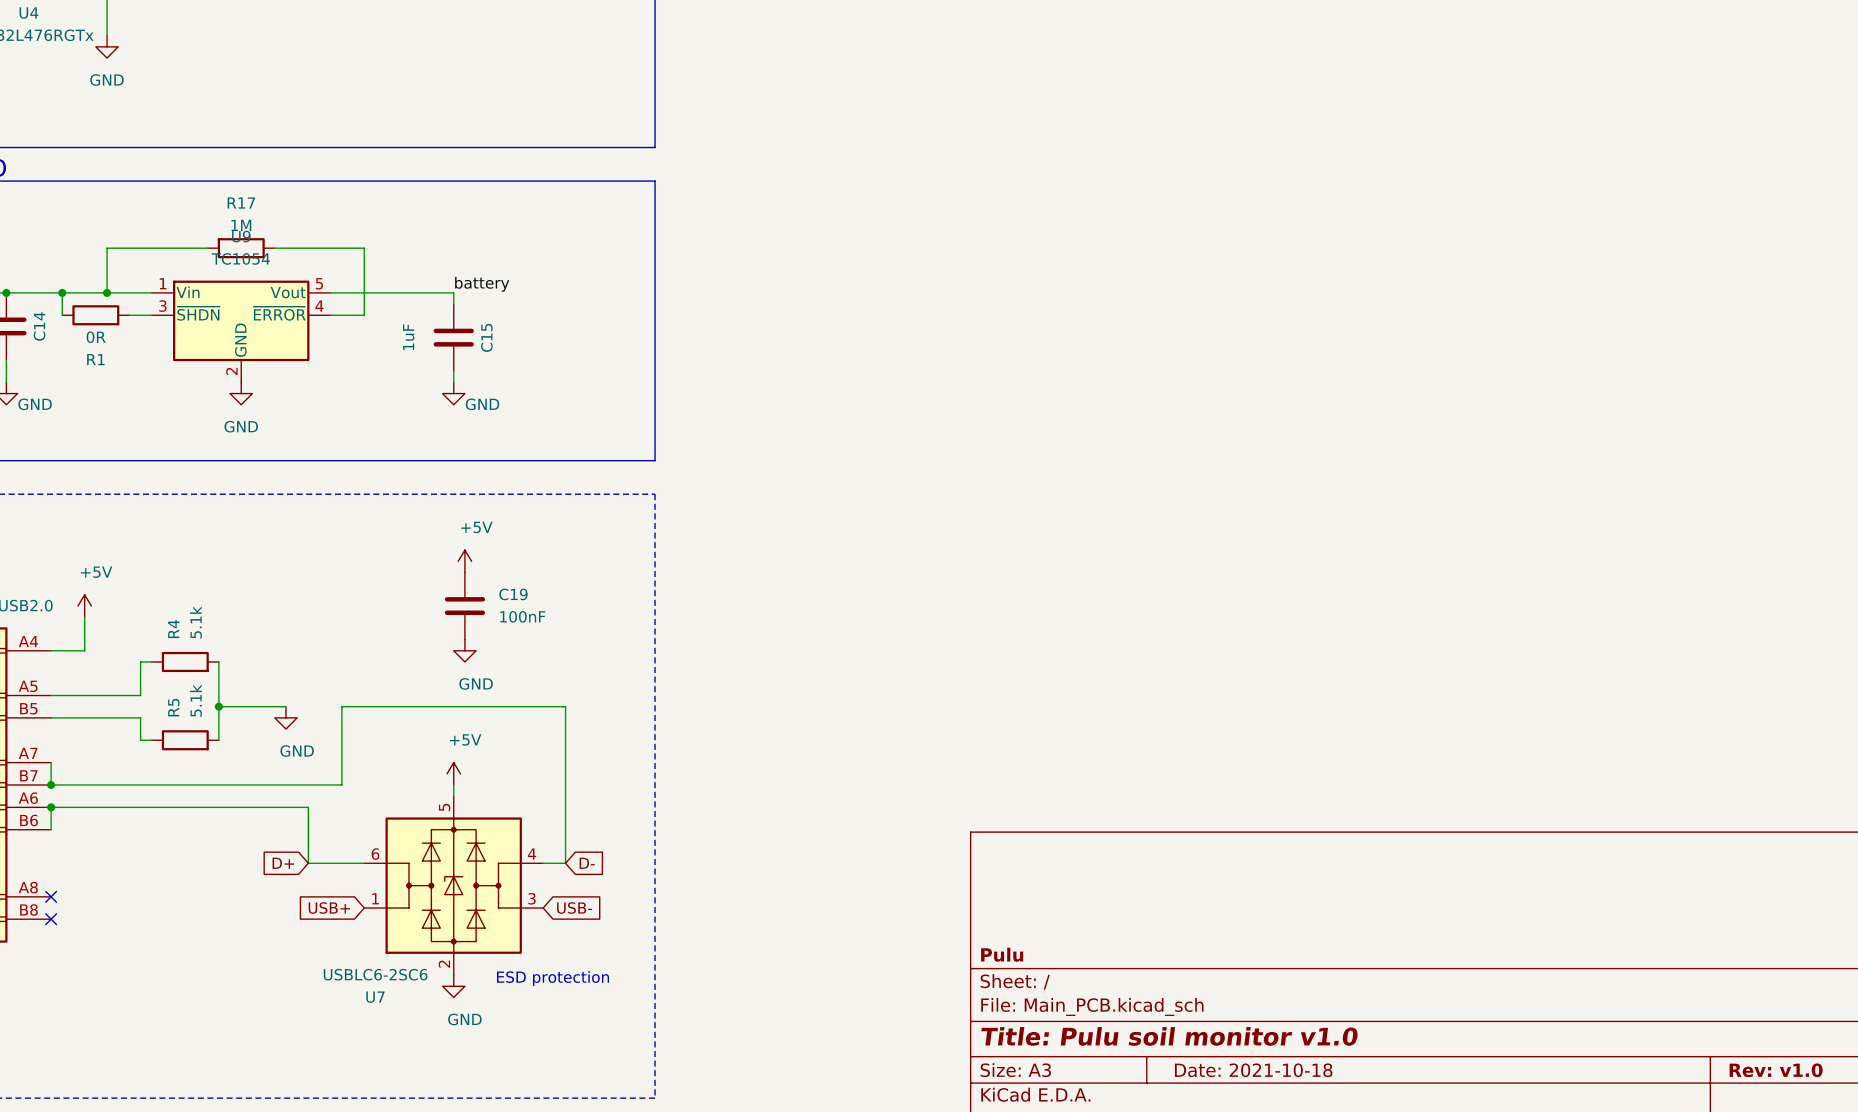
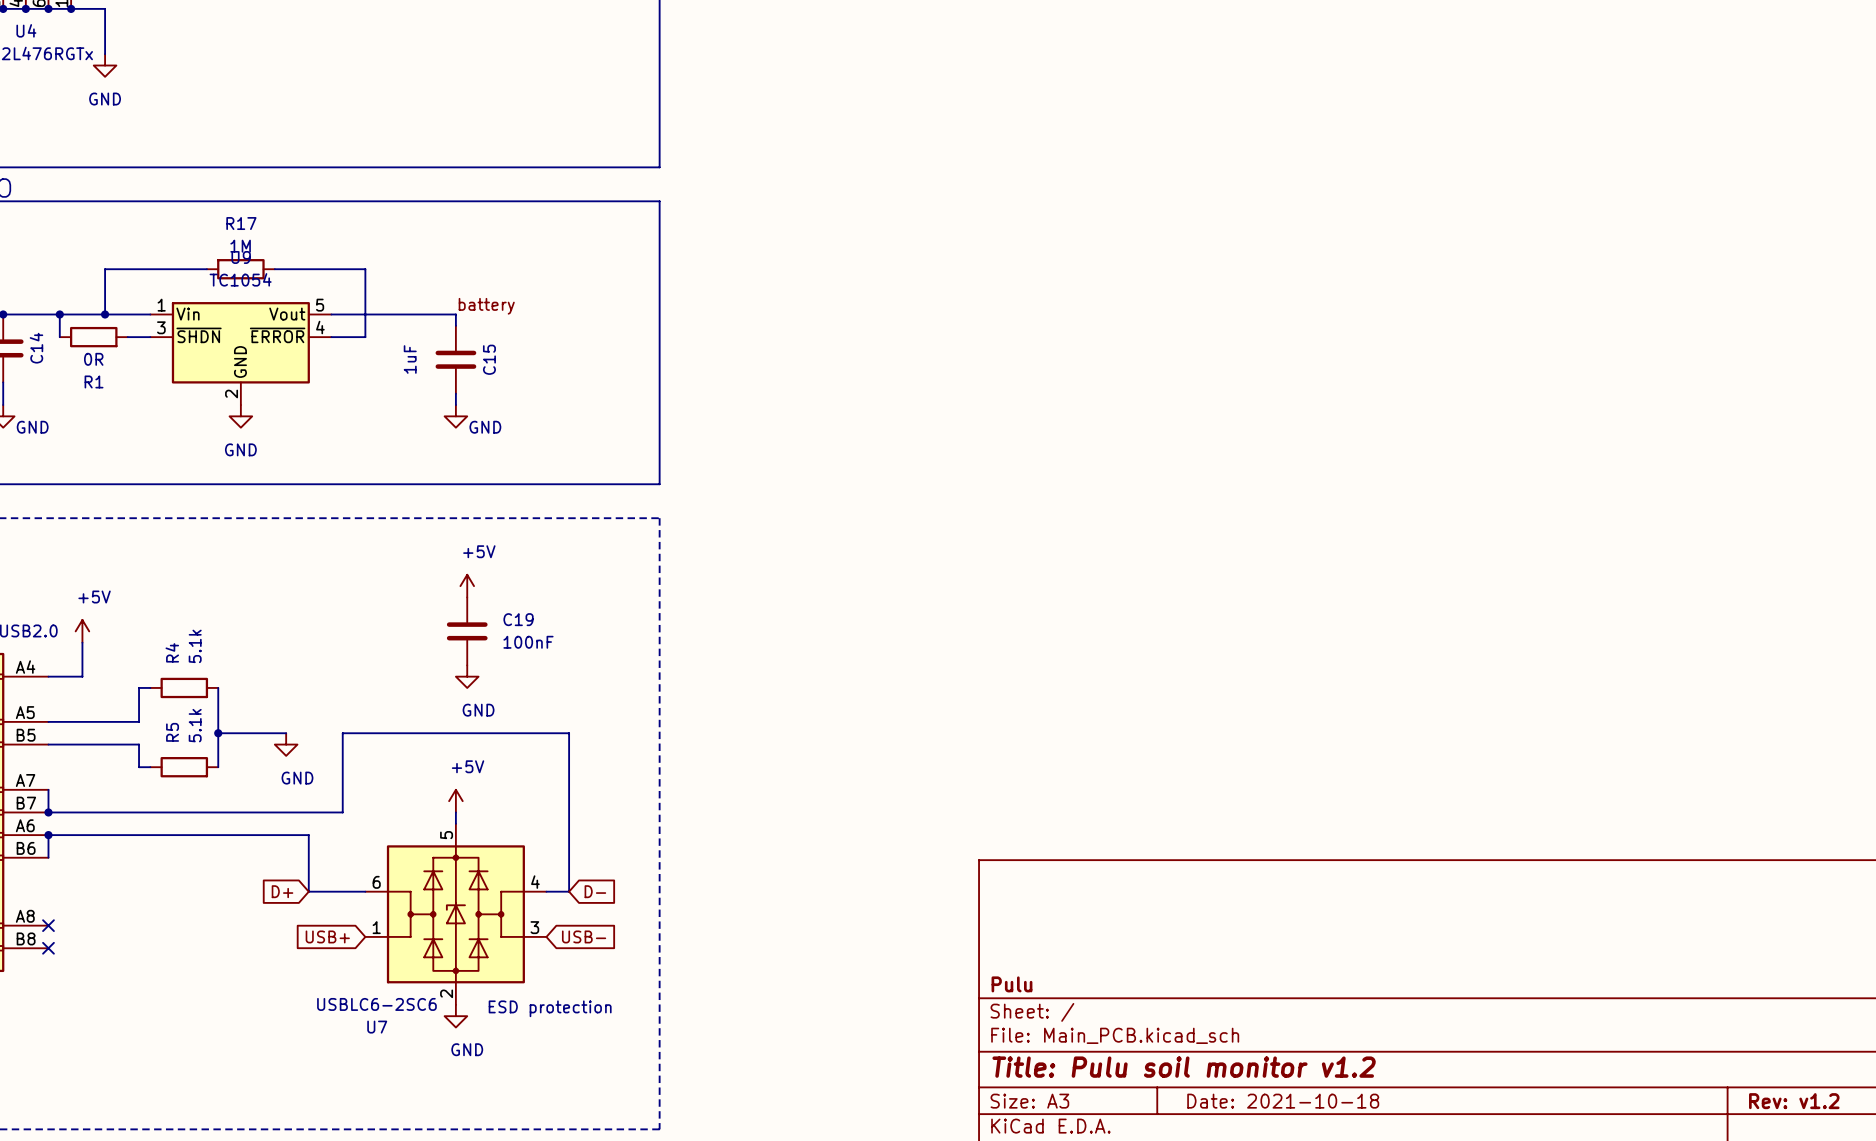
title block: Title: Pulu soil monitor v1.0 (1169, 1036) -> Title: Pulu soil monitor v1.2 (1184, 1067)
title block: Rev: v1.0 (1776, 1070) -> Rev: v1.2 (1794, 1101)

